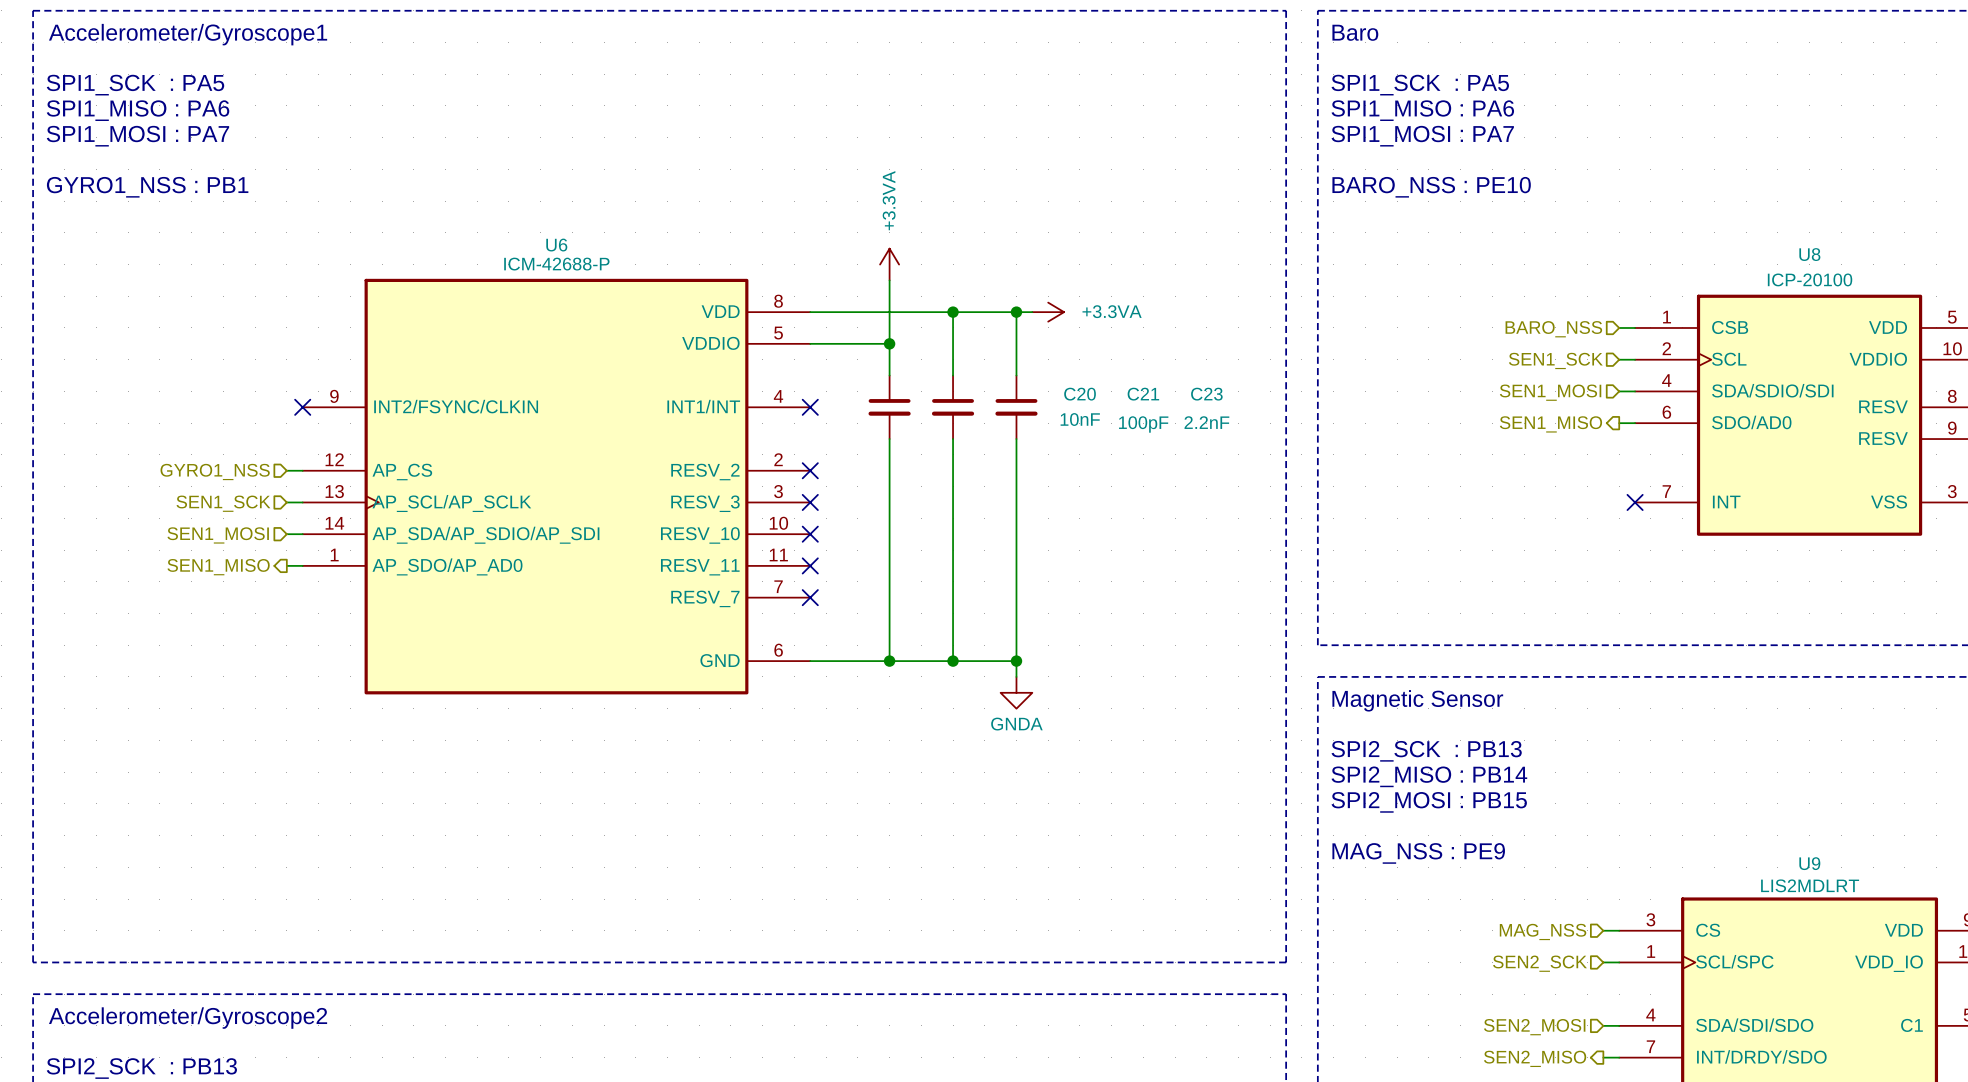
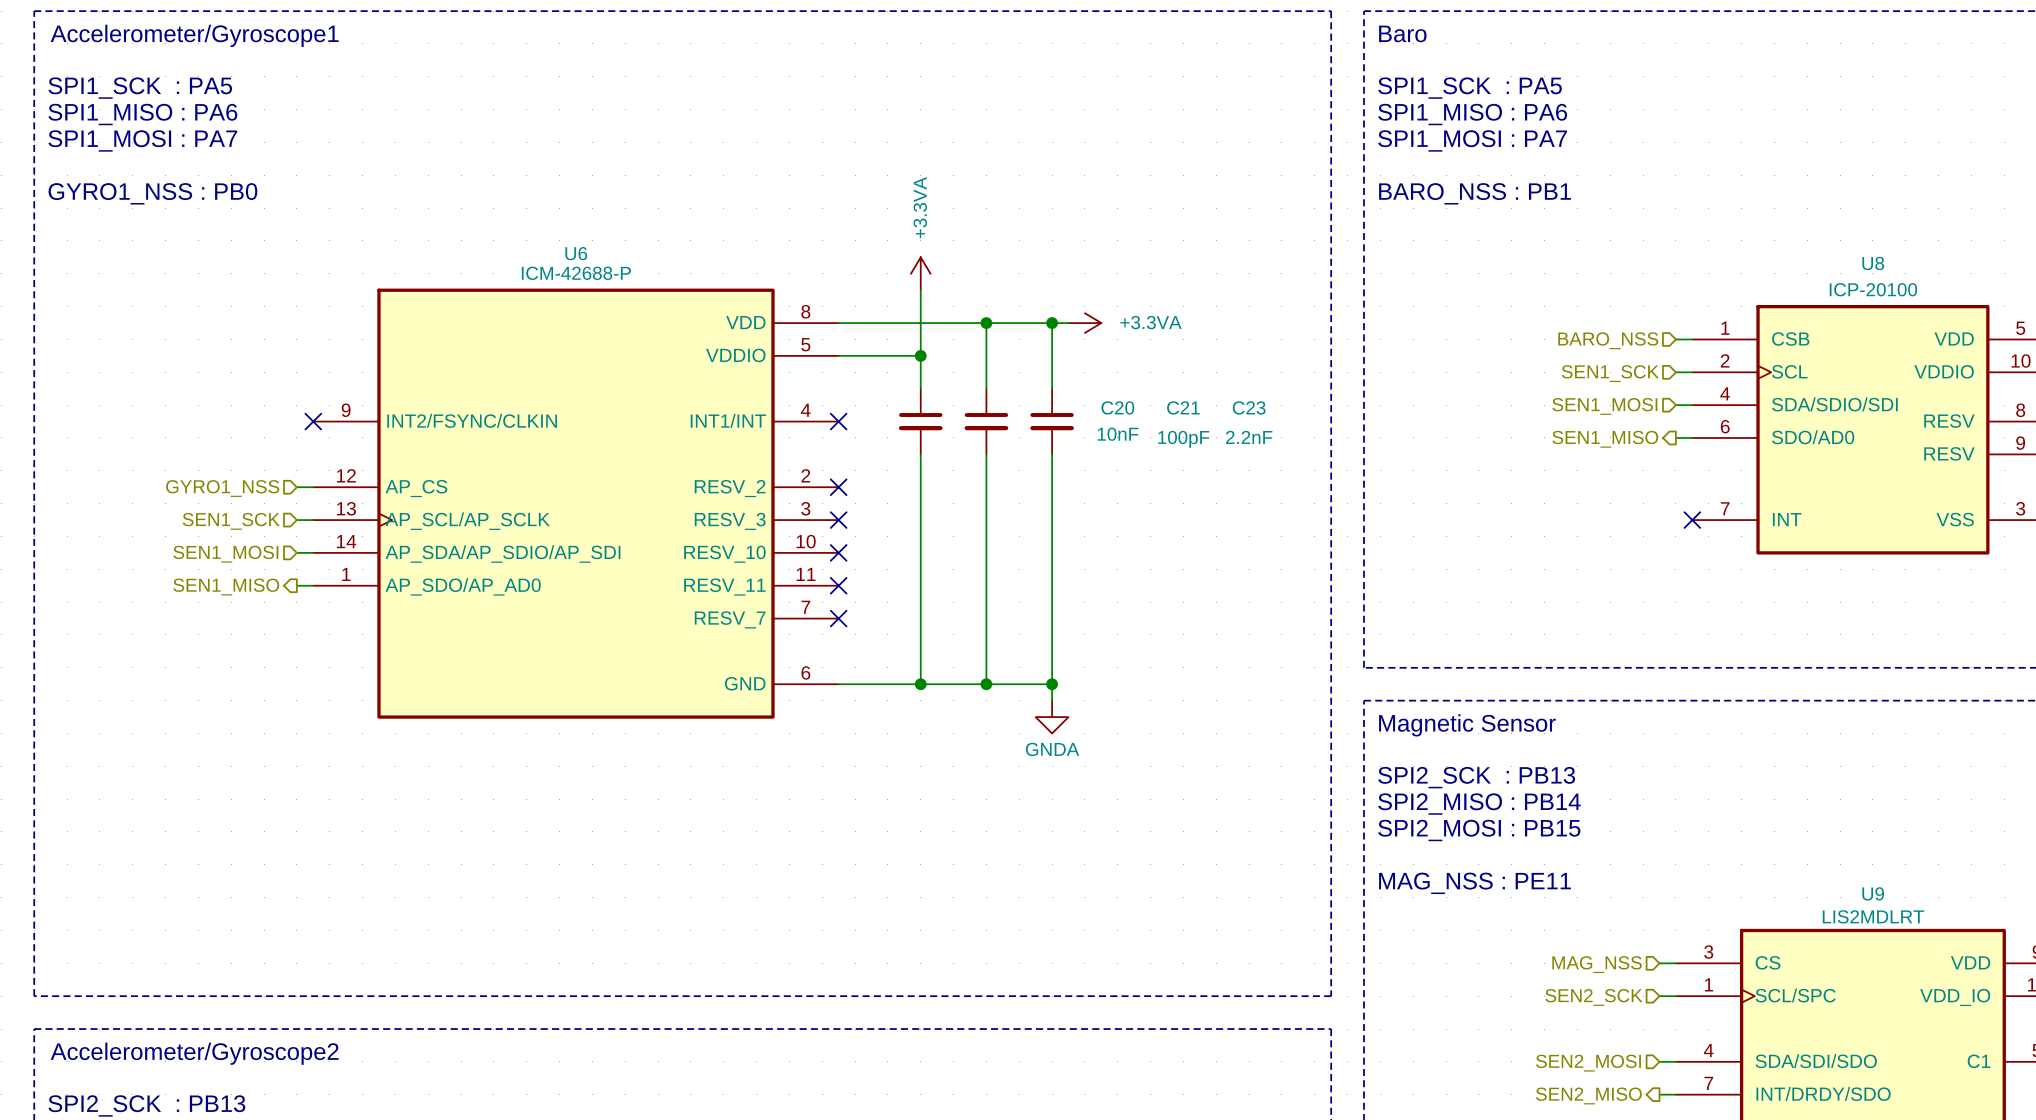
text: GYRO1_NSS : PB1 (147, 187) -> GYRO1_NSS : PB0 (152, 193)
text: BARO_NSS : PE10 (1431, 187) -> BARO_NSS : PB1 (1475, 193)
text: MAG_NSS : PE9 (1418, 853) -> MAG_NSS : PE11 (1475, 883)

